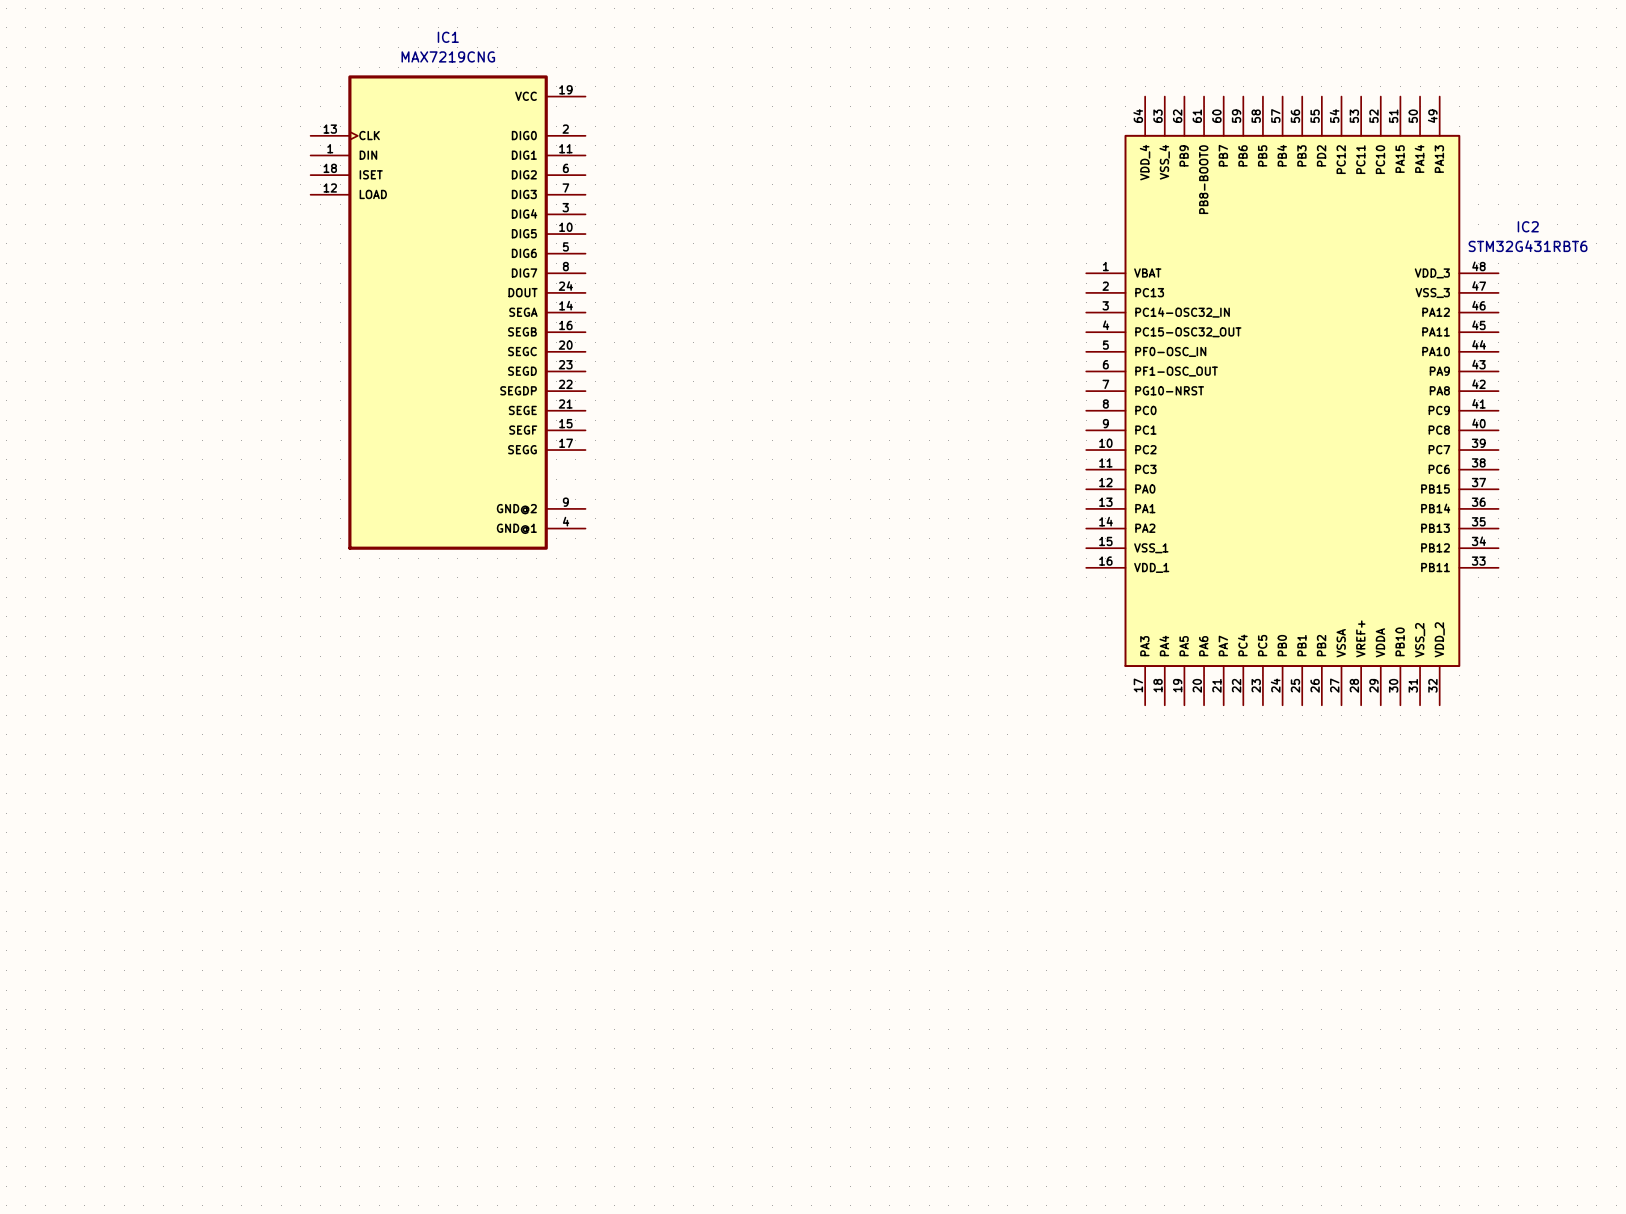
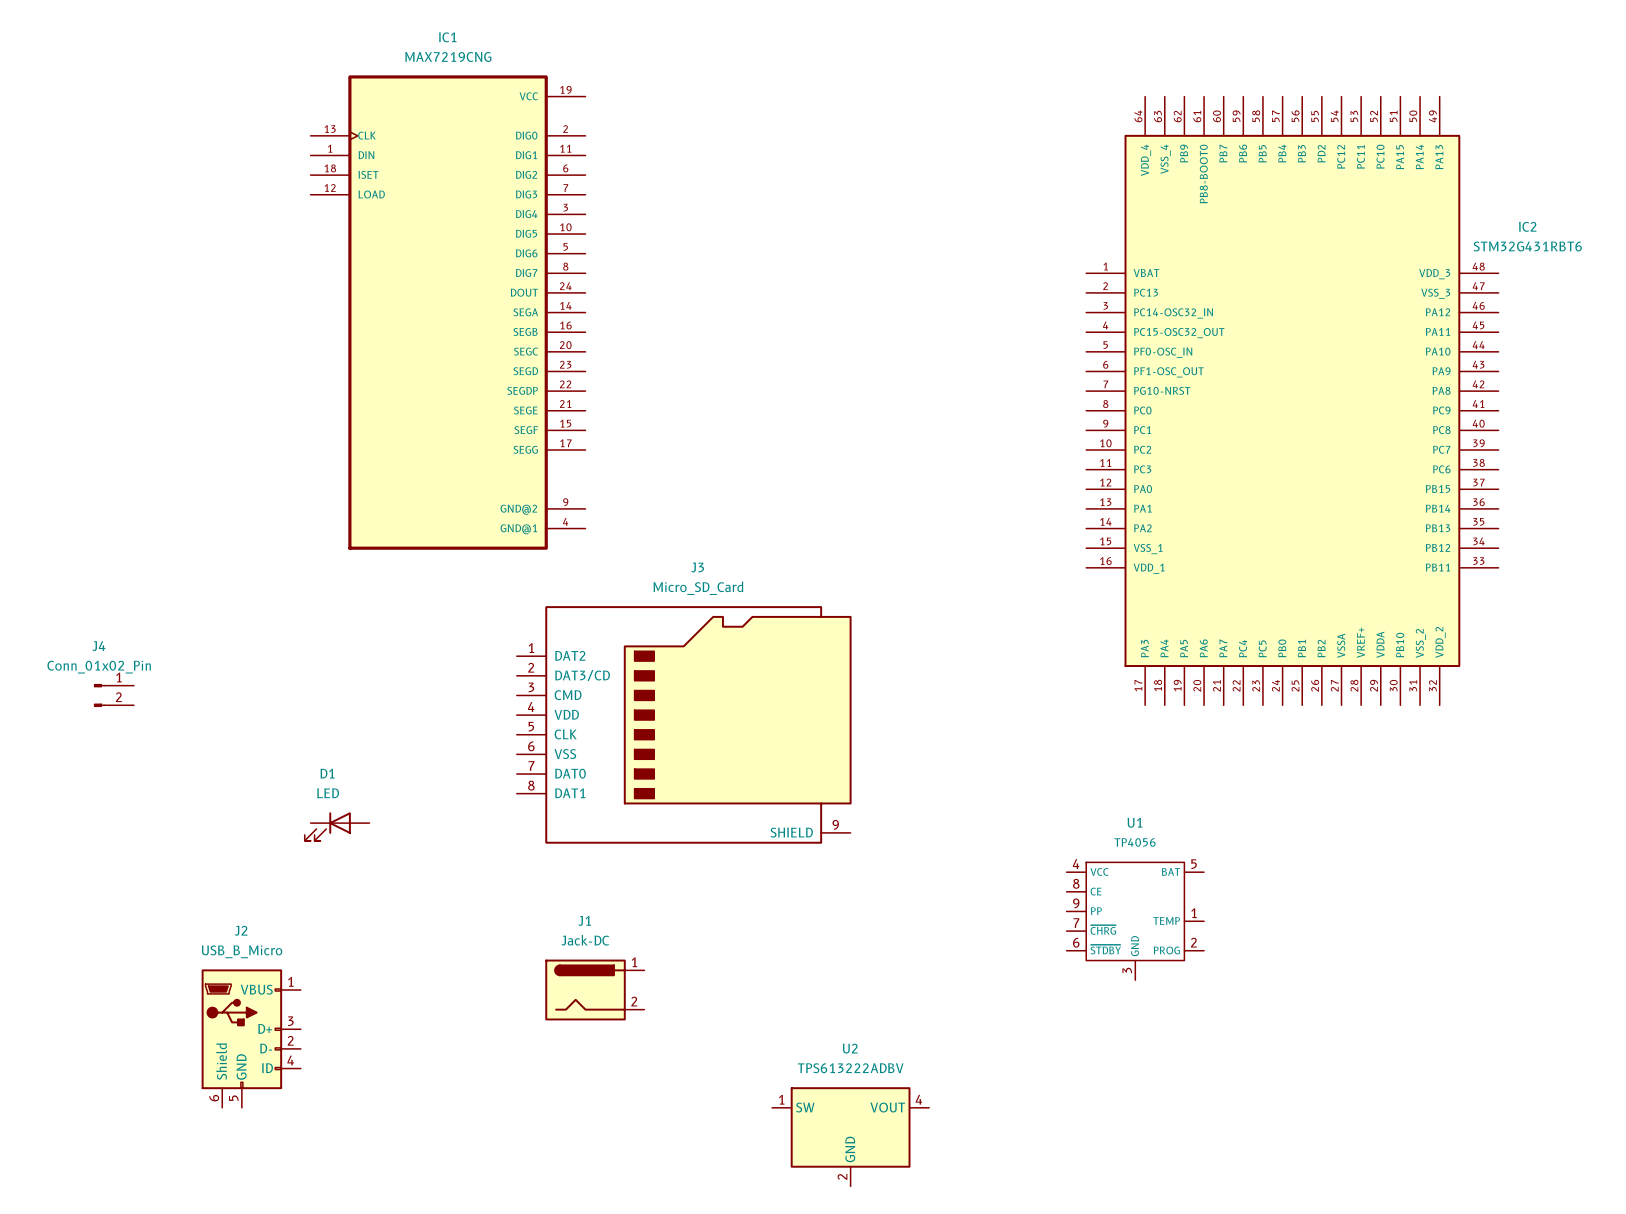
J4: none -> Conn_01x02_Pin (113, 695)
J3: none -> Micro_SD_Card (684, 724)
D1: none -> LED (337, 826)
U1: none -> TP4056 (1135, 921)
J1: none -> Jack-DC (594, 990)
J2: none -> USB_B_Micro (251, 1038)
U2: none -> TPS613222ADBV (850, 1136)

